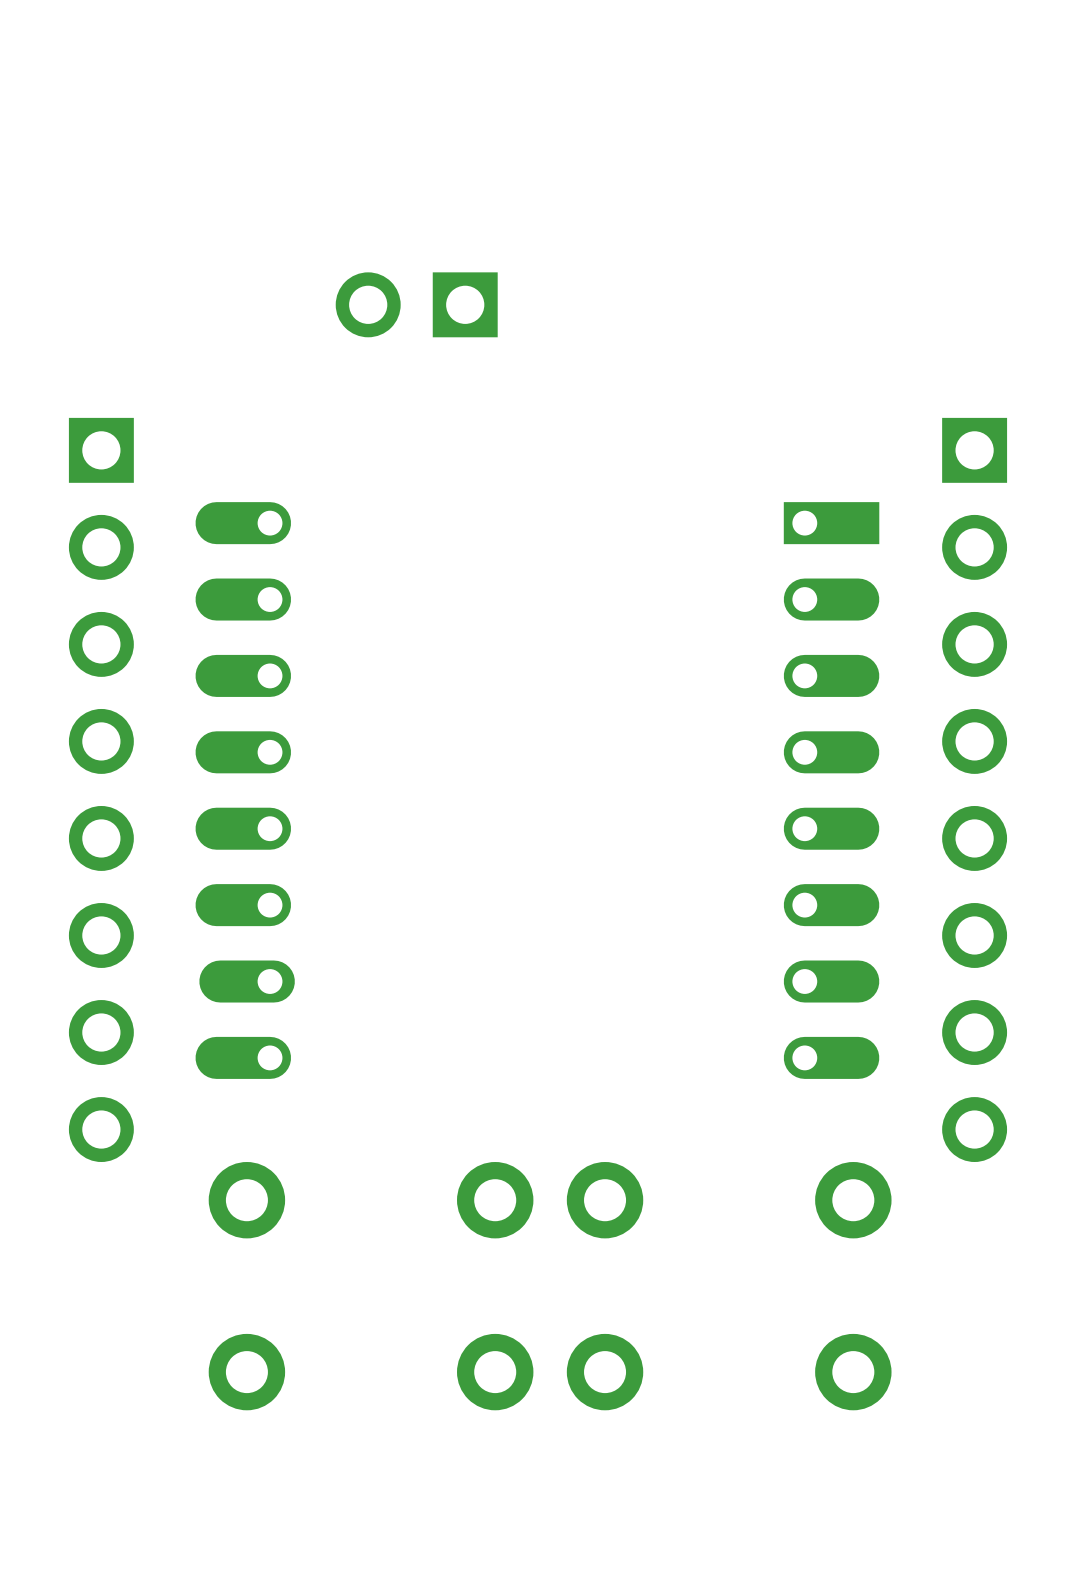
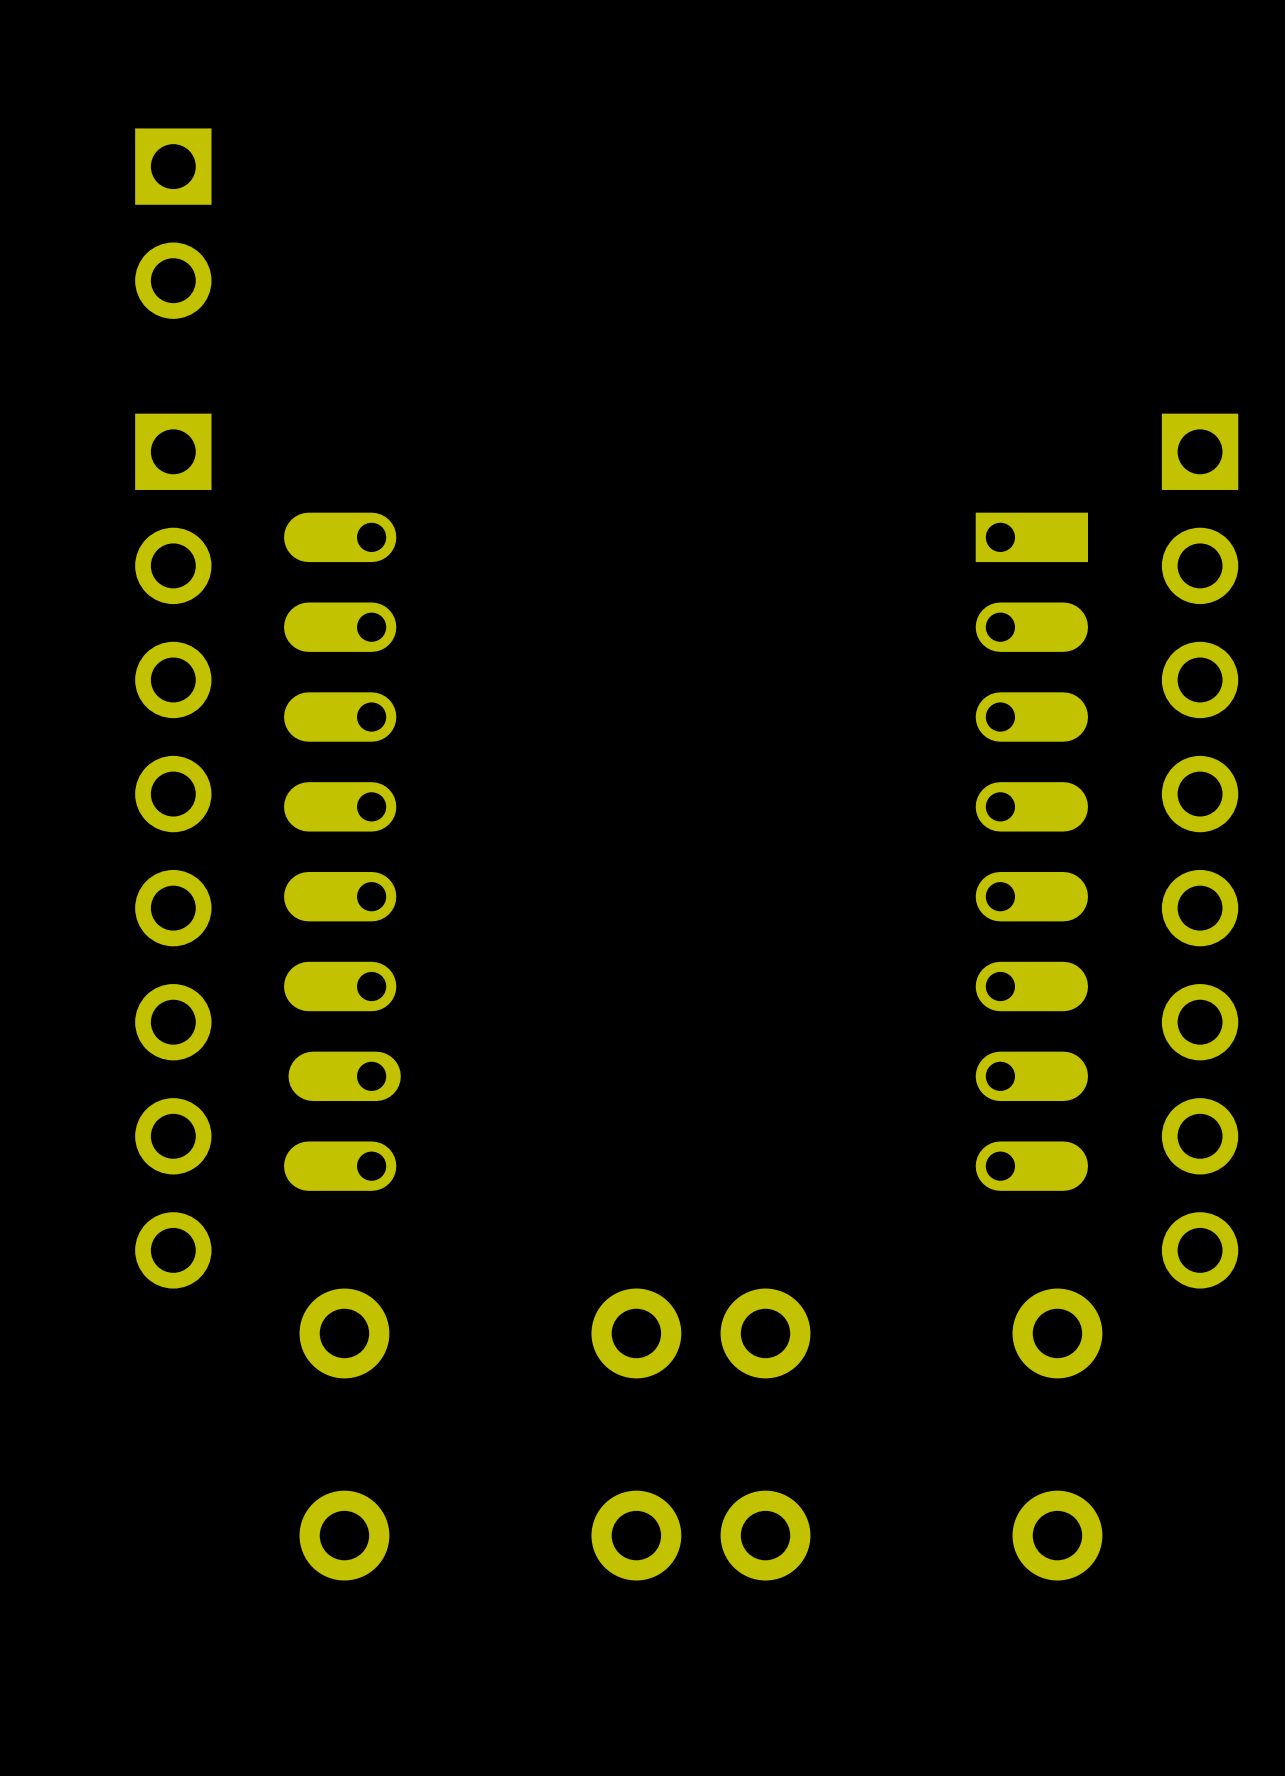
part rotation: 0° (416, 304) -> 90° counterclockwise (173, 223)
part position: (416, 304) -> (173, 223)

